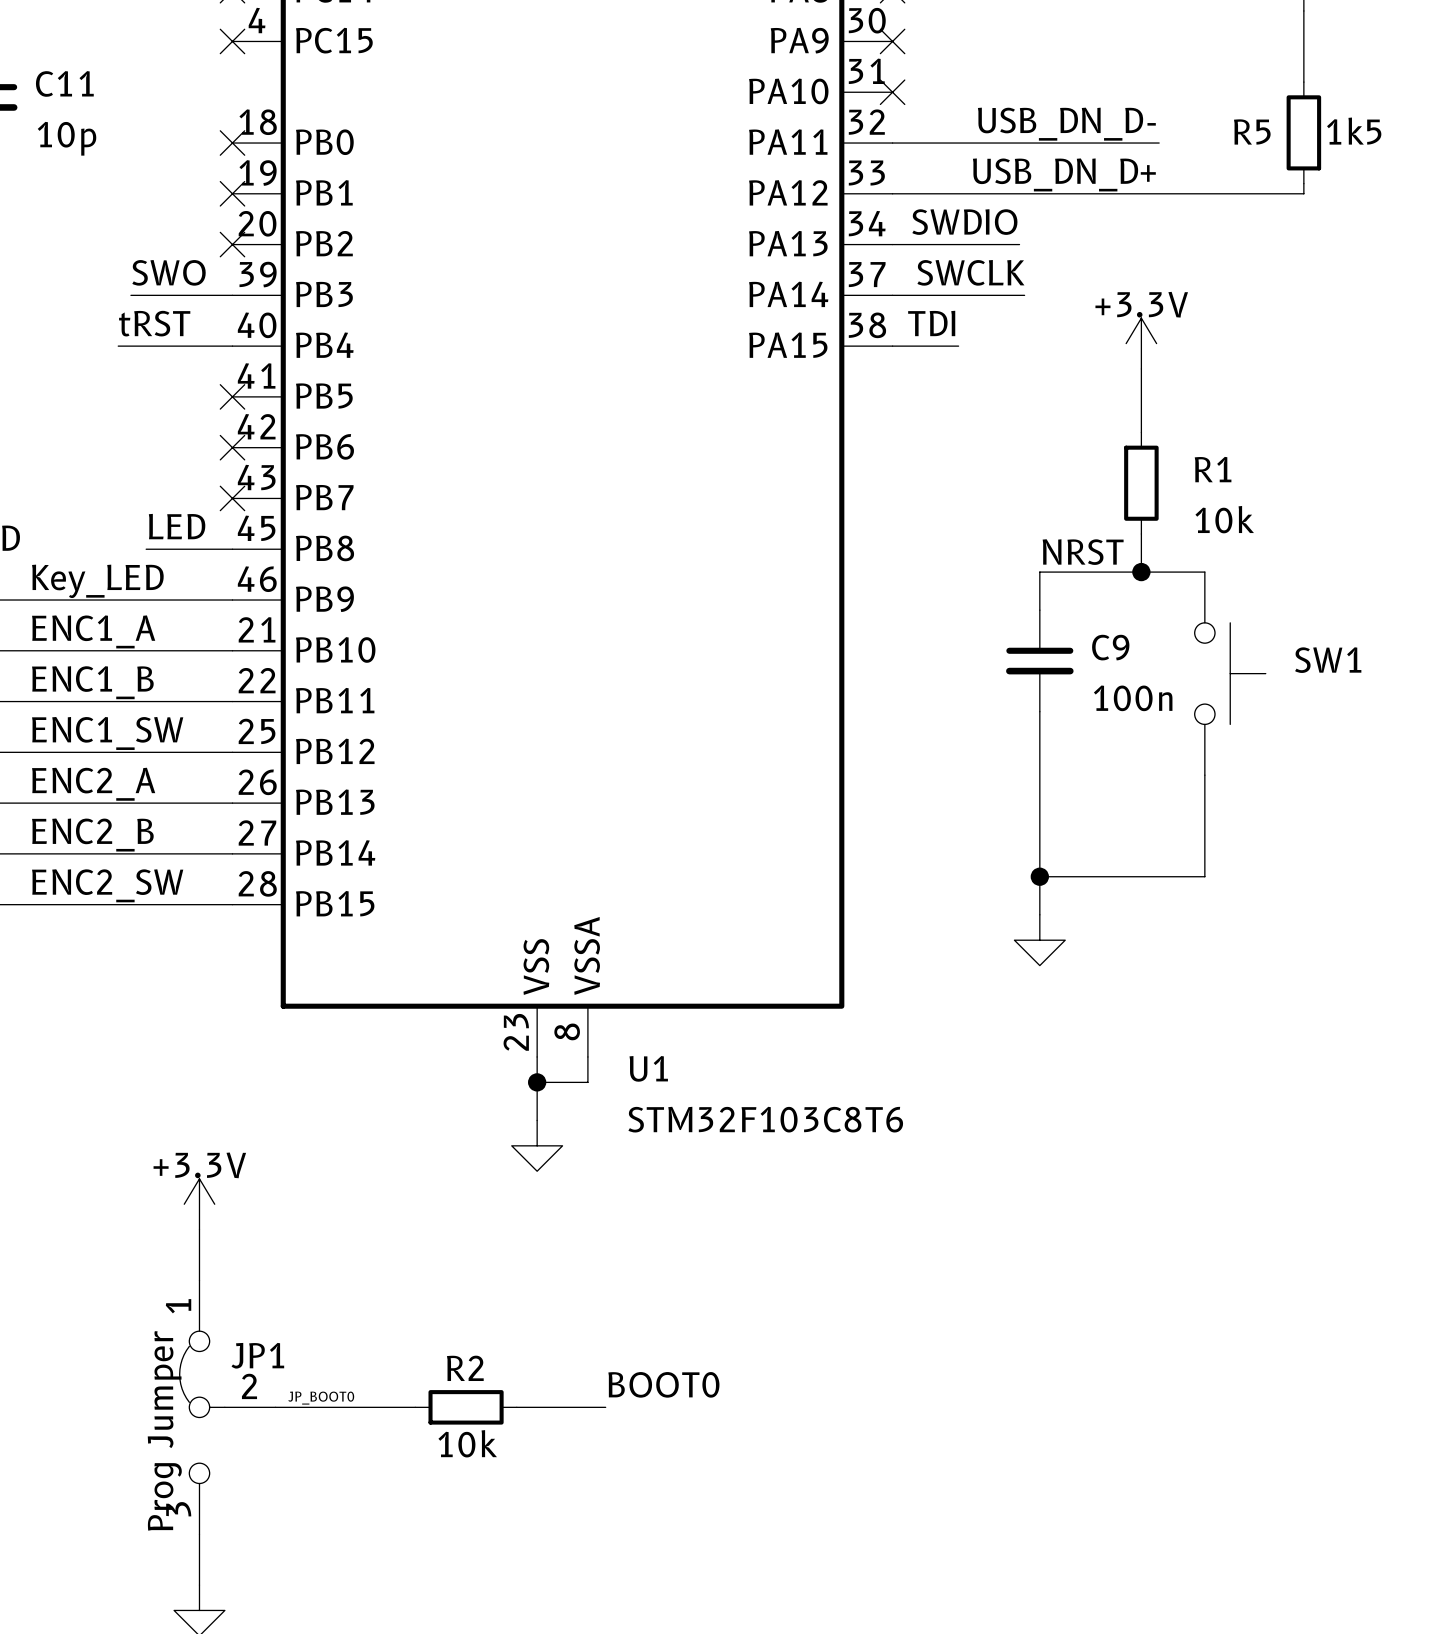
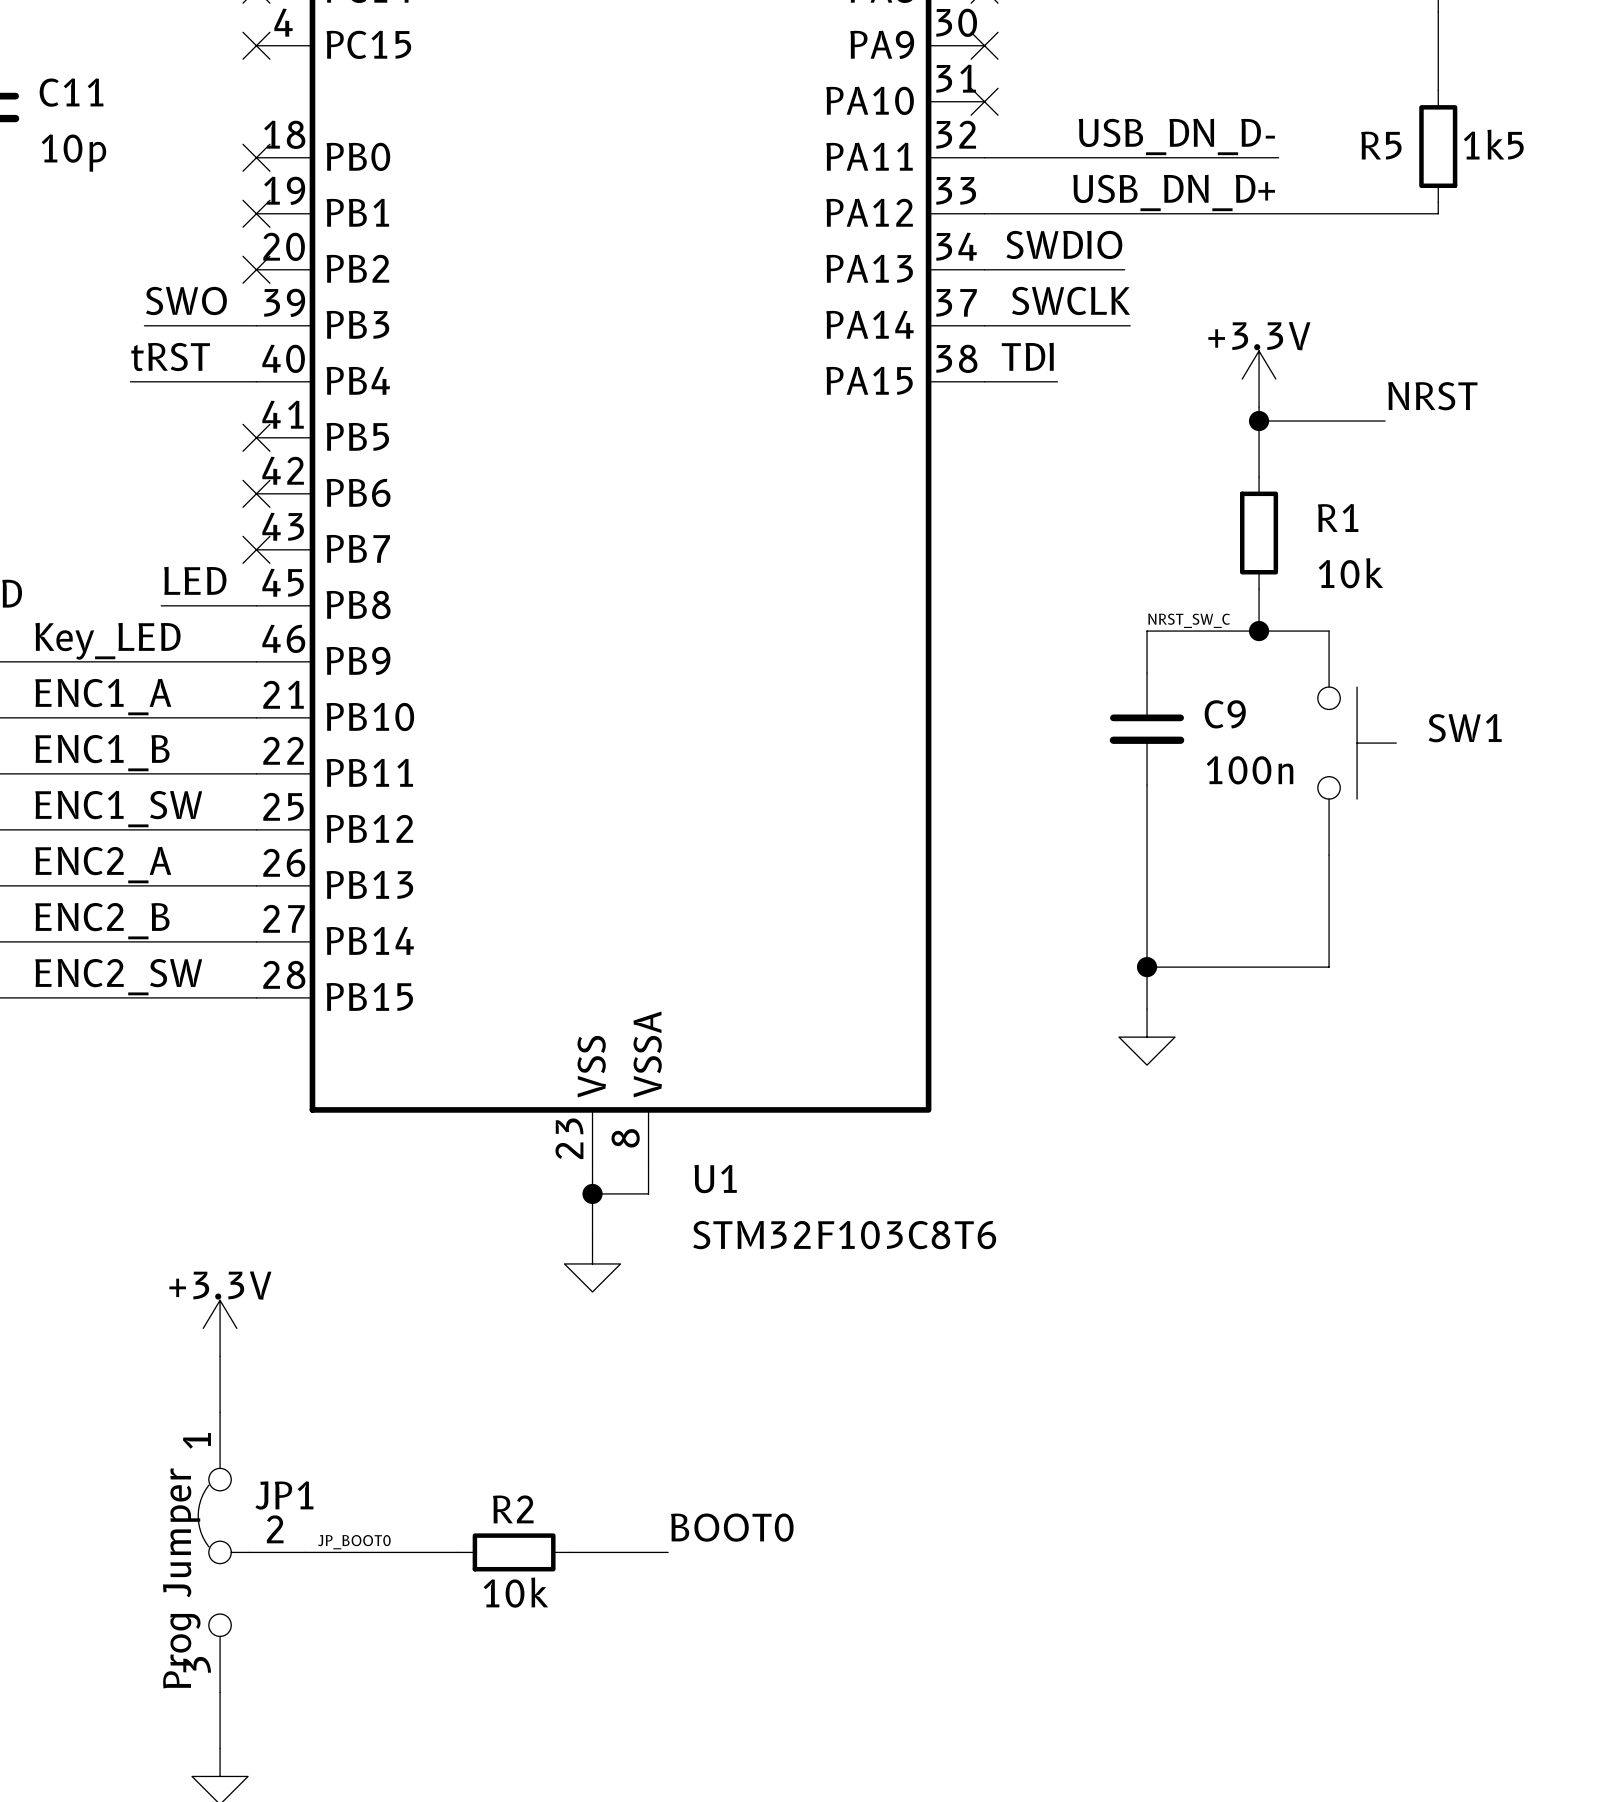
label: none -> NRST (1432, 396)
wire: none -> (1259, 421) (1385, 421)
junction: none -> (1259, 421)
label: NRST (1083, 552) -> NRST_SW_C (1189, 620)

